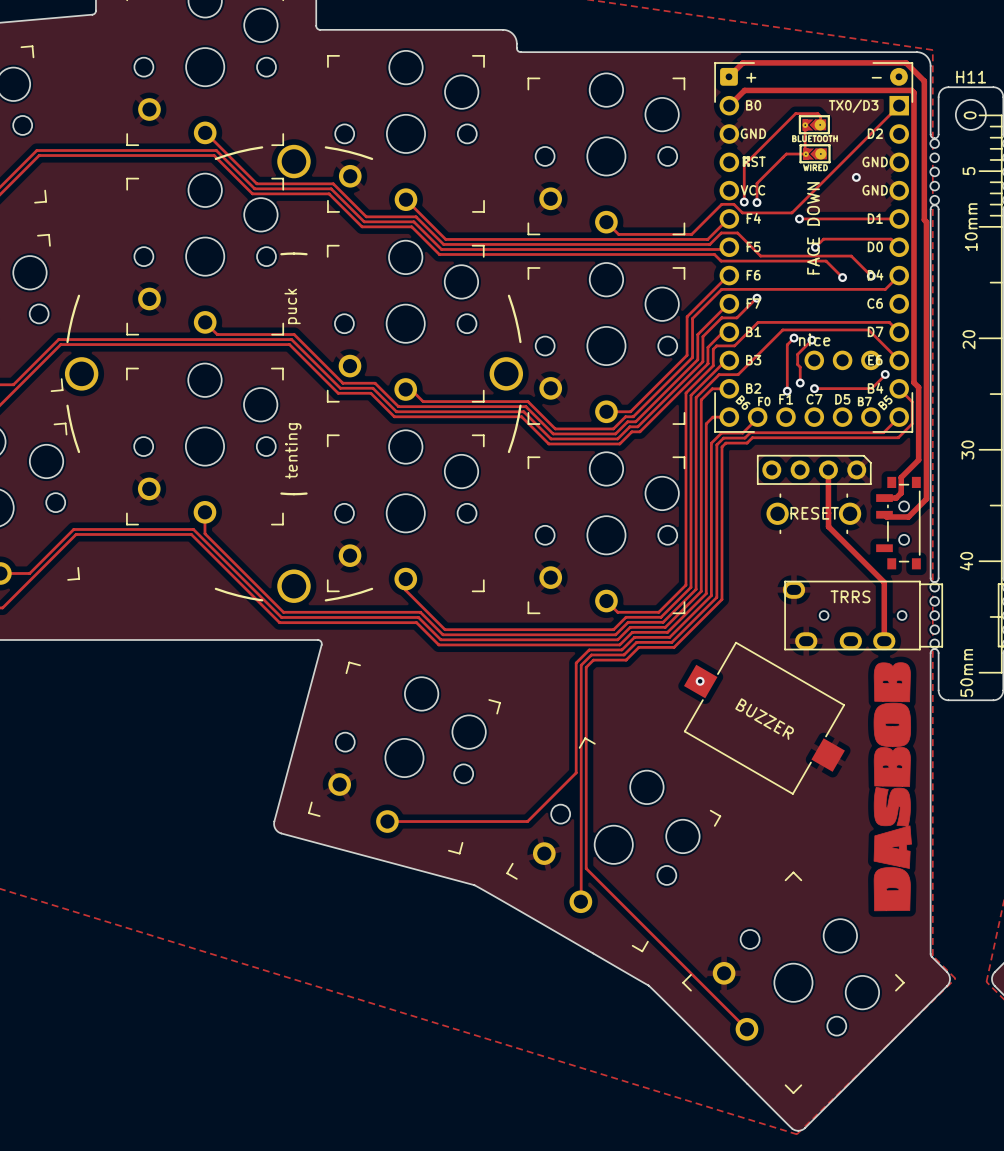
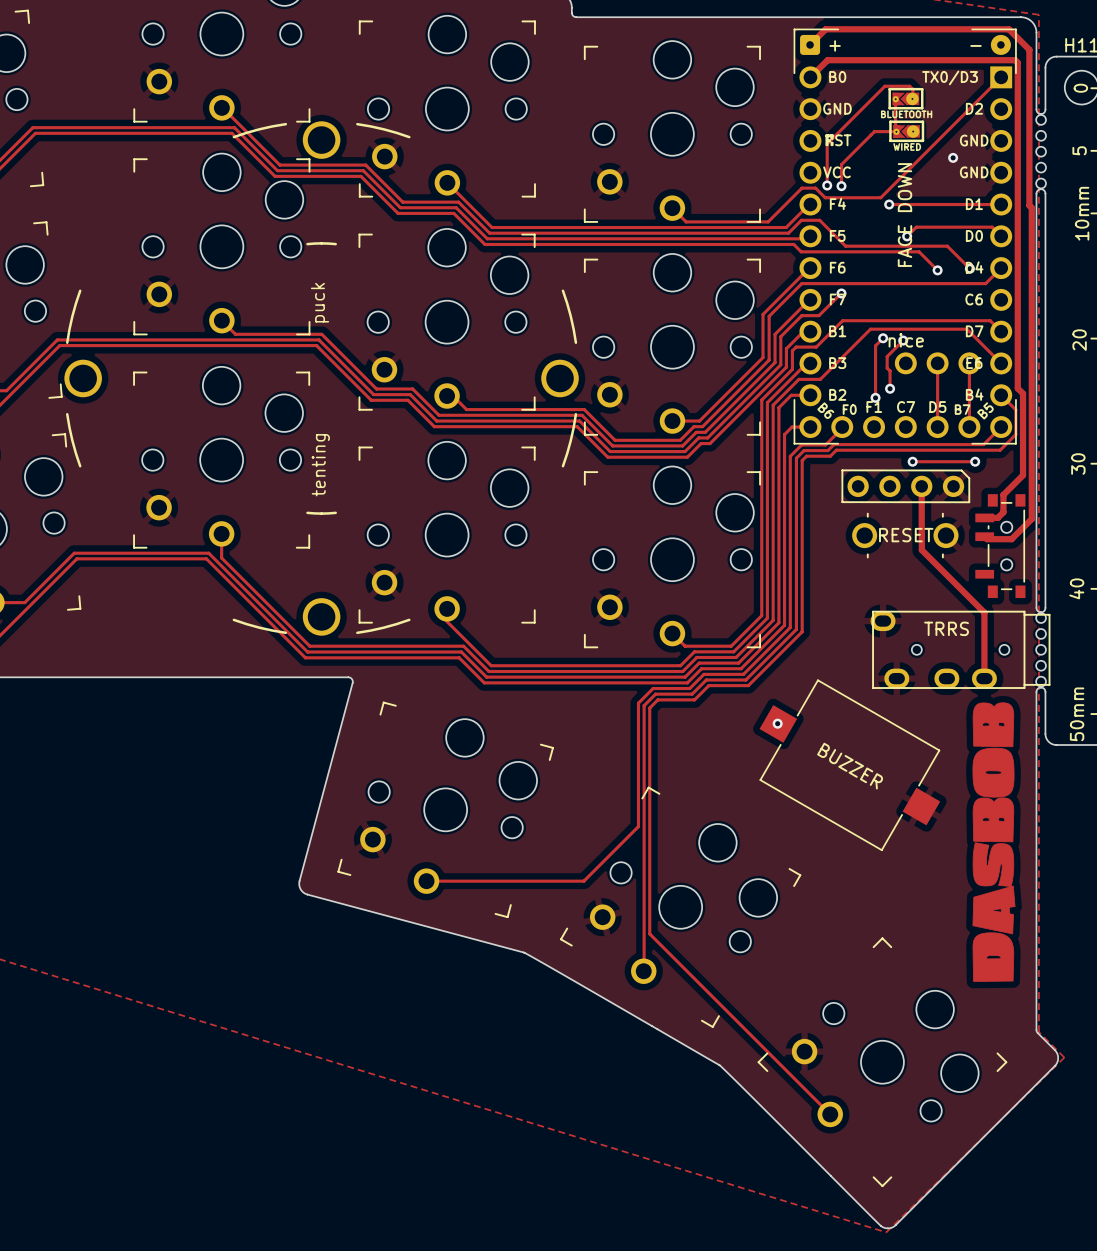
track: none -> (937, 363) (937, 427)
track: none -> (969, 363) (969, 427)
via: (885, 374) -> none
track: (885, 375) (871, 388) (814, 388) -> none
via: (814, 388) -> none
track: none -> (912, 461) (975, 461)
via: none -> (912, 461)
via: none -> (975, 461)

